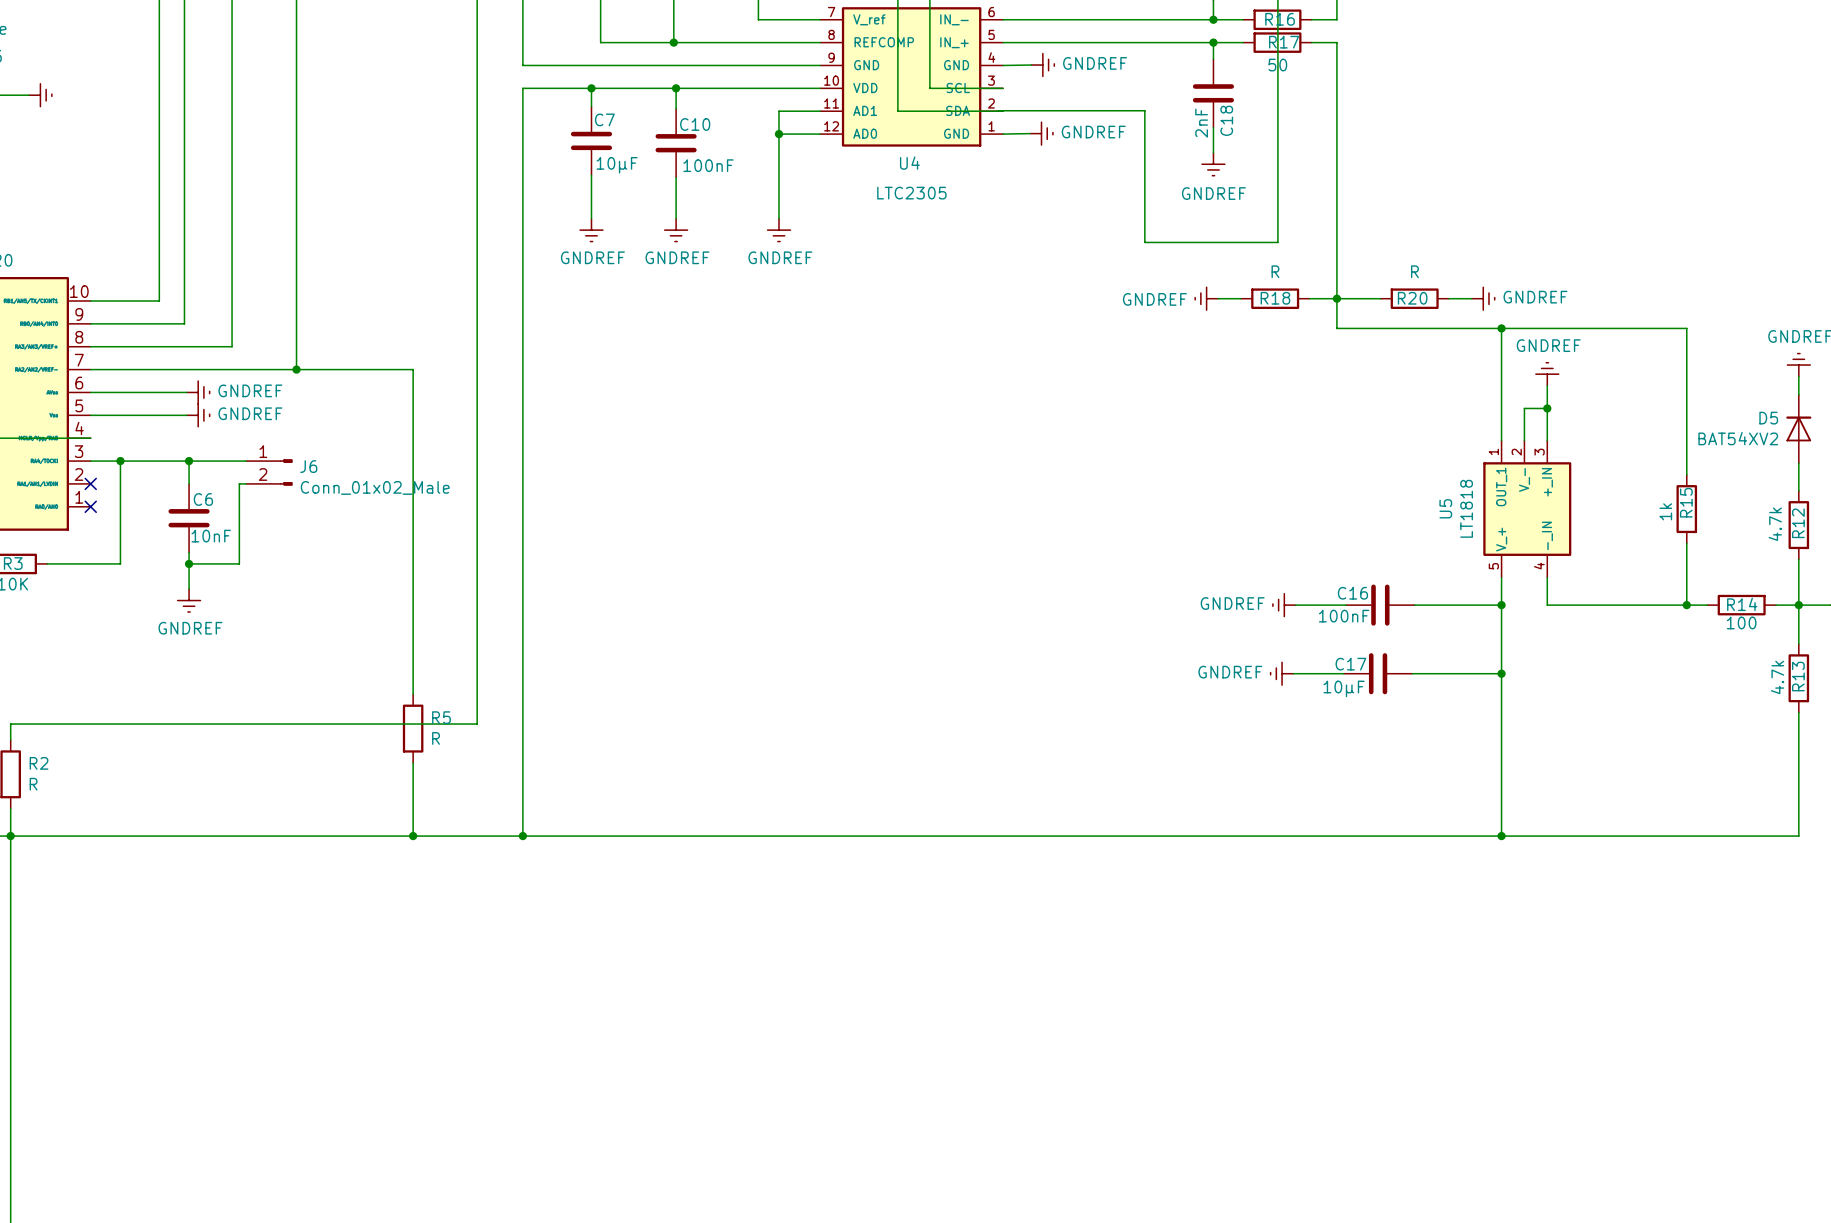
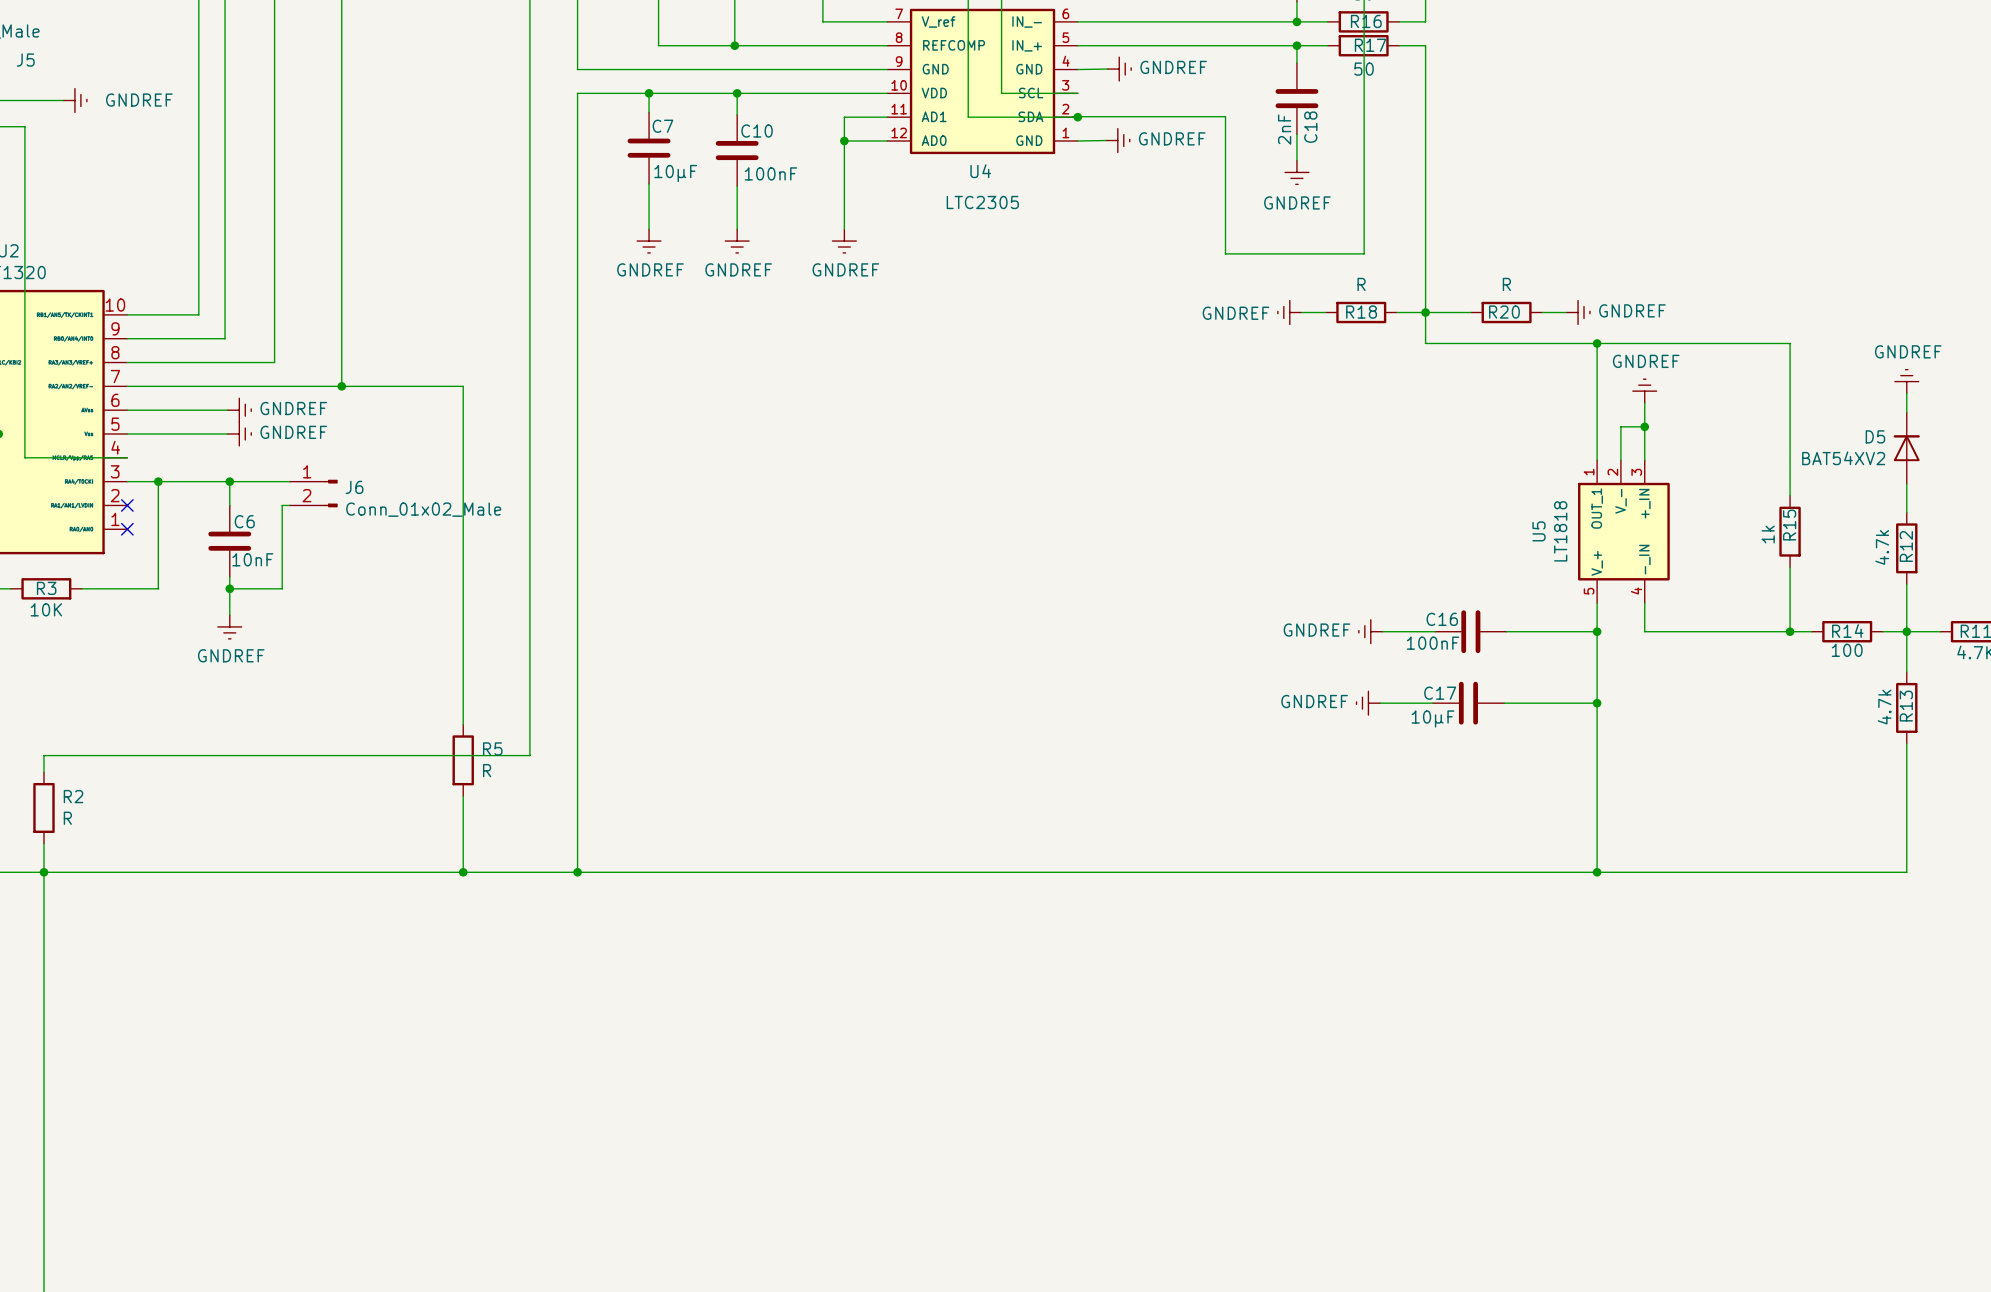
power symbol text: none -> GNDREF (139, 100)
junction: none -> (1077, 117)

